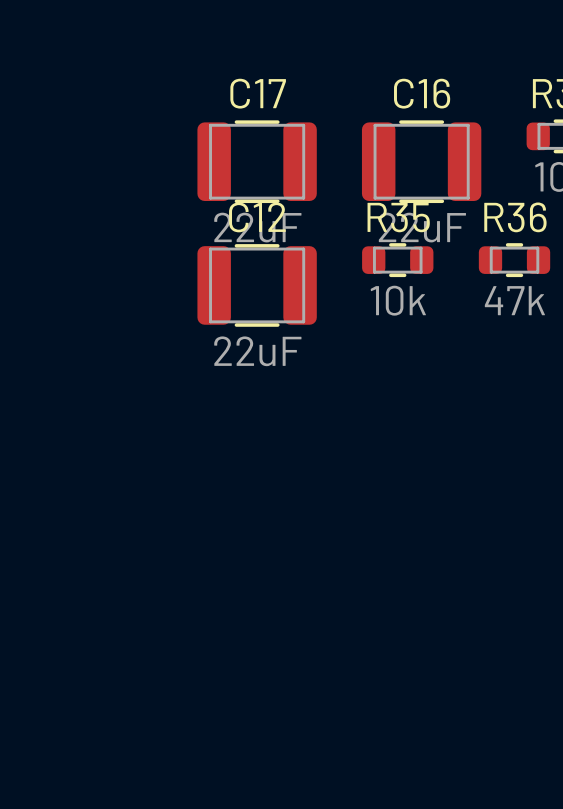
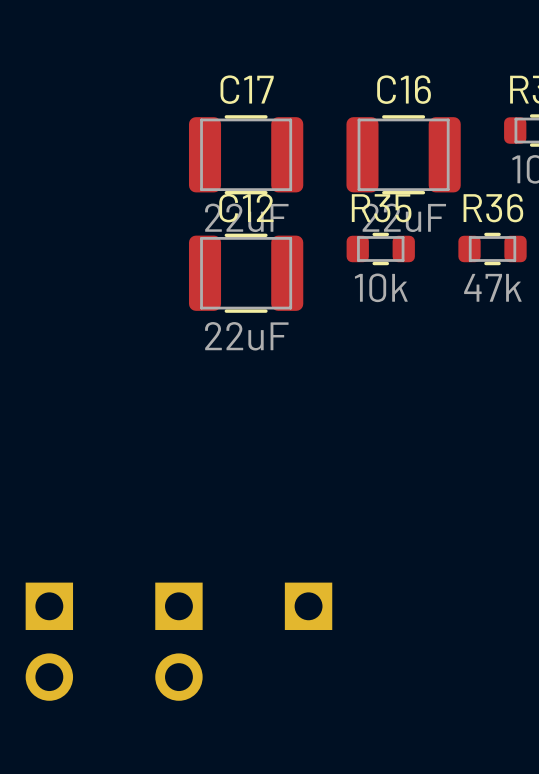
part: none -> (308, 606)
part: none -> (49, 641)
part: none -> (178, 641)

